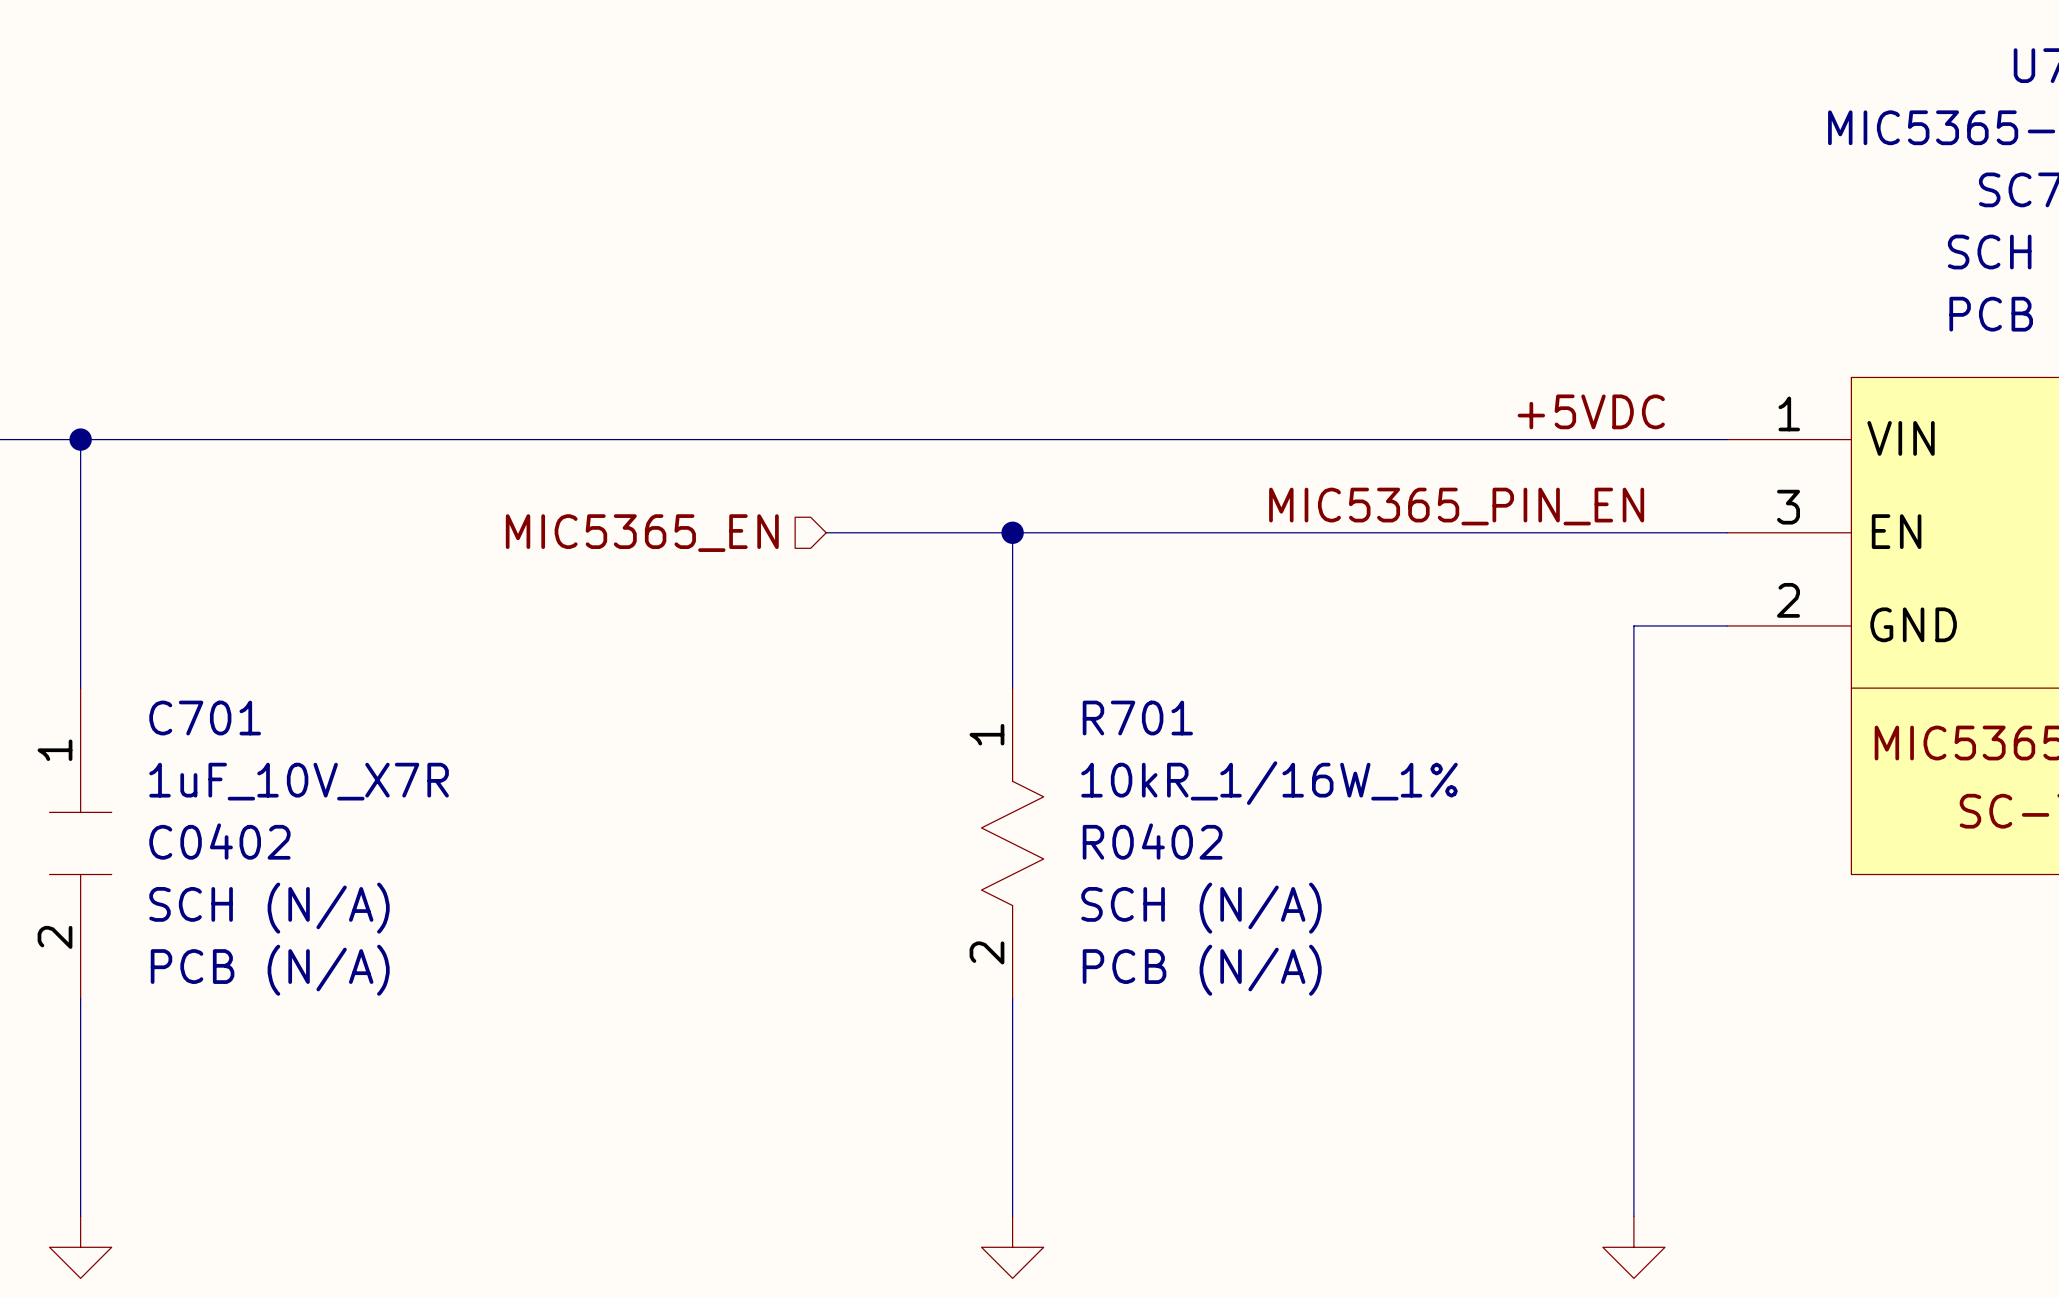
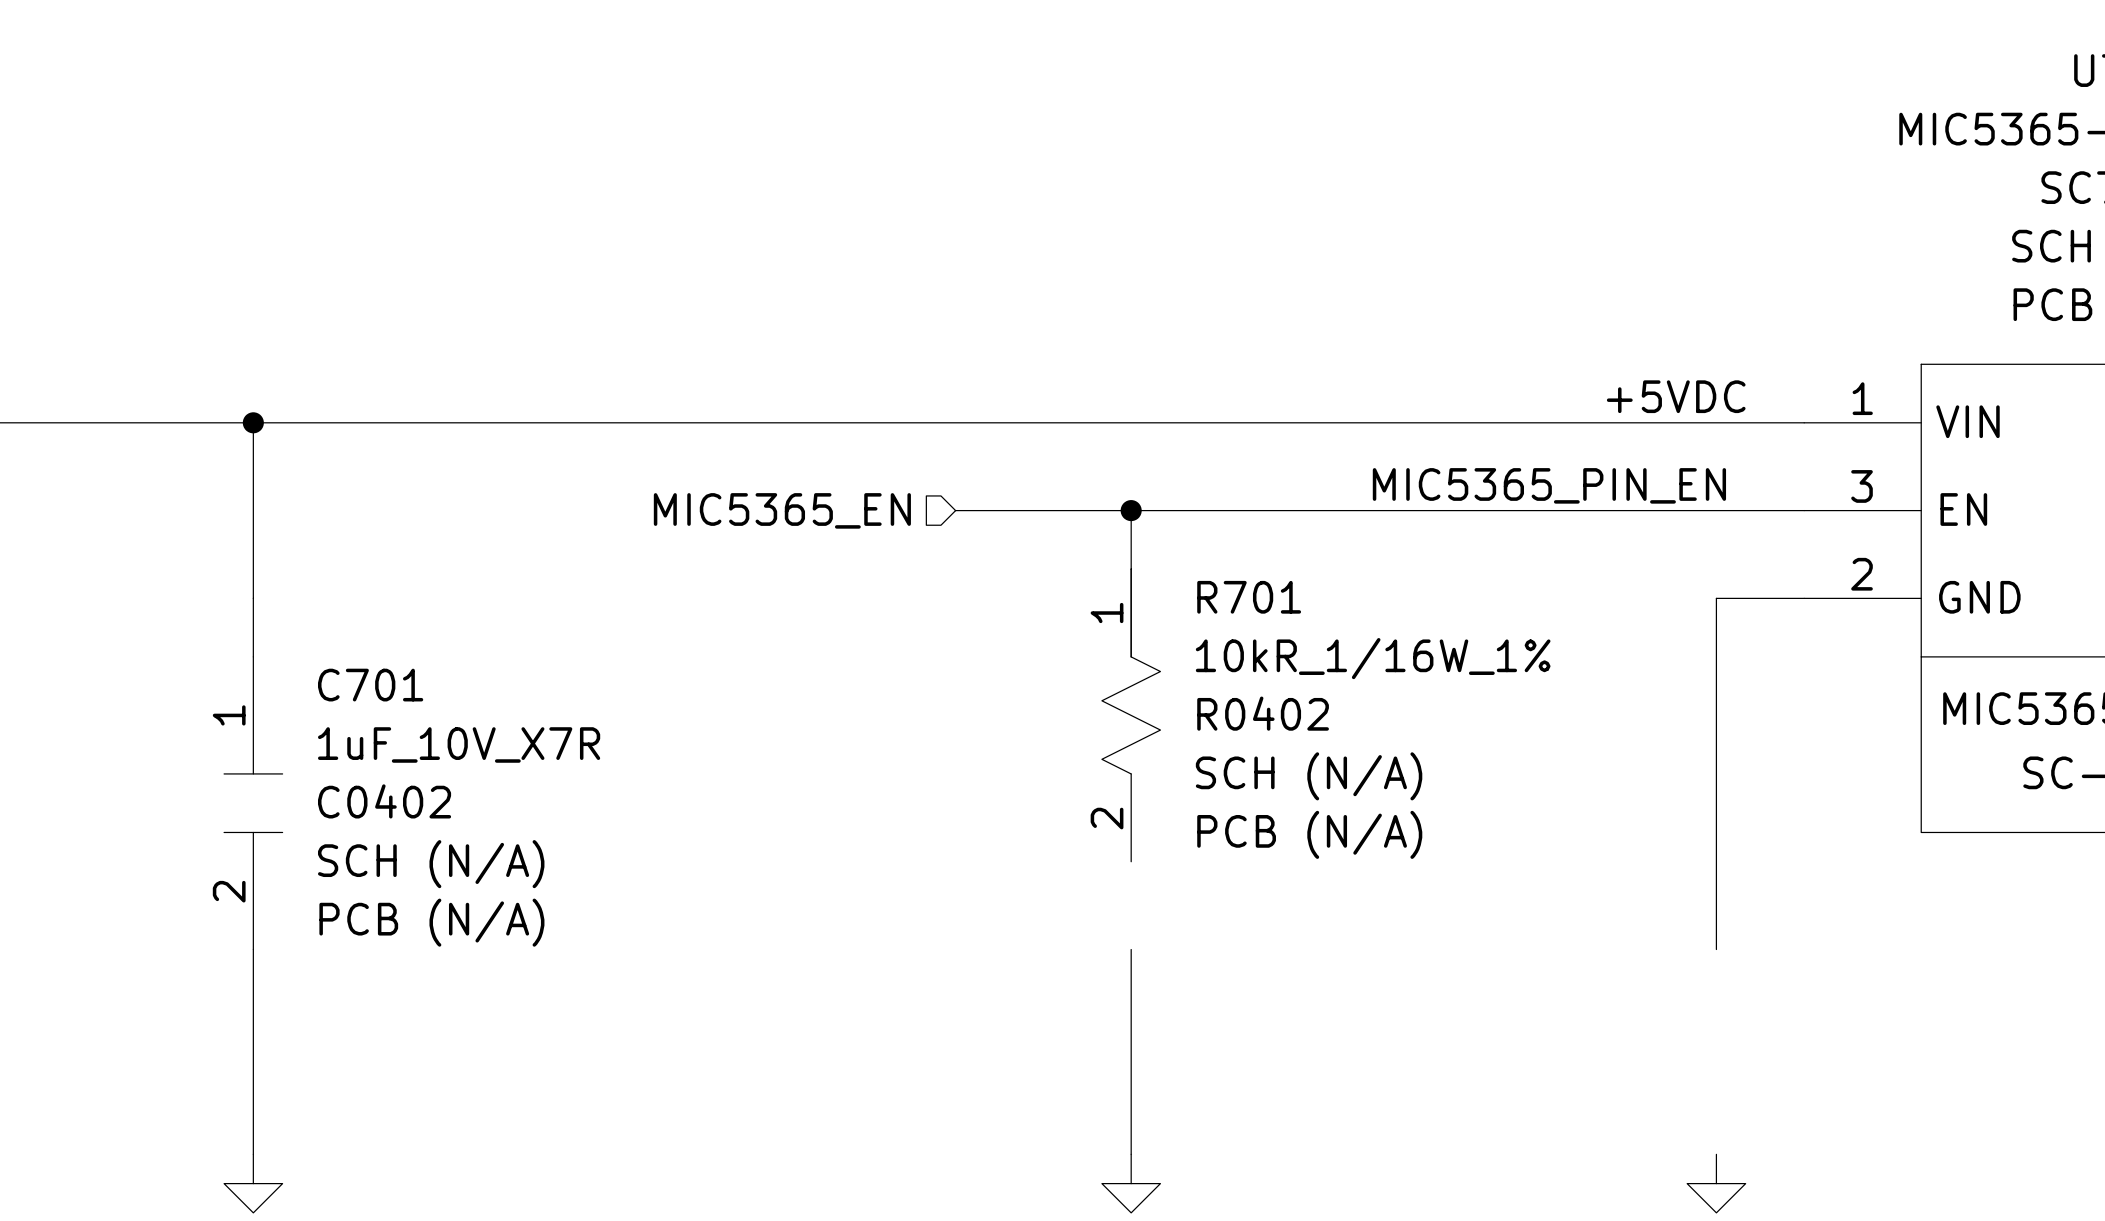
R701 position: (1012, 843) -> (1131, 715)
wire: (1633, 998) (1633, 1216) -> none

